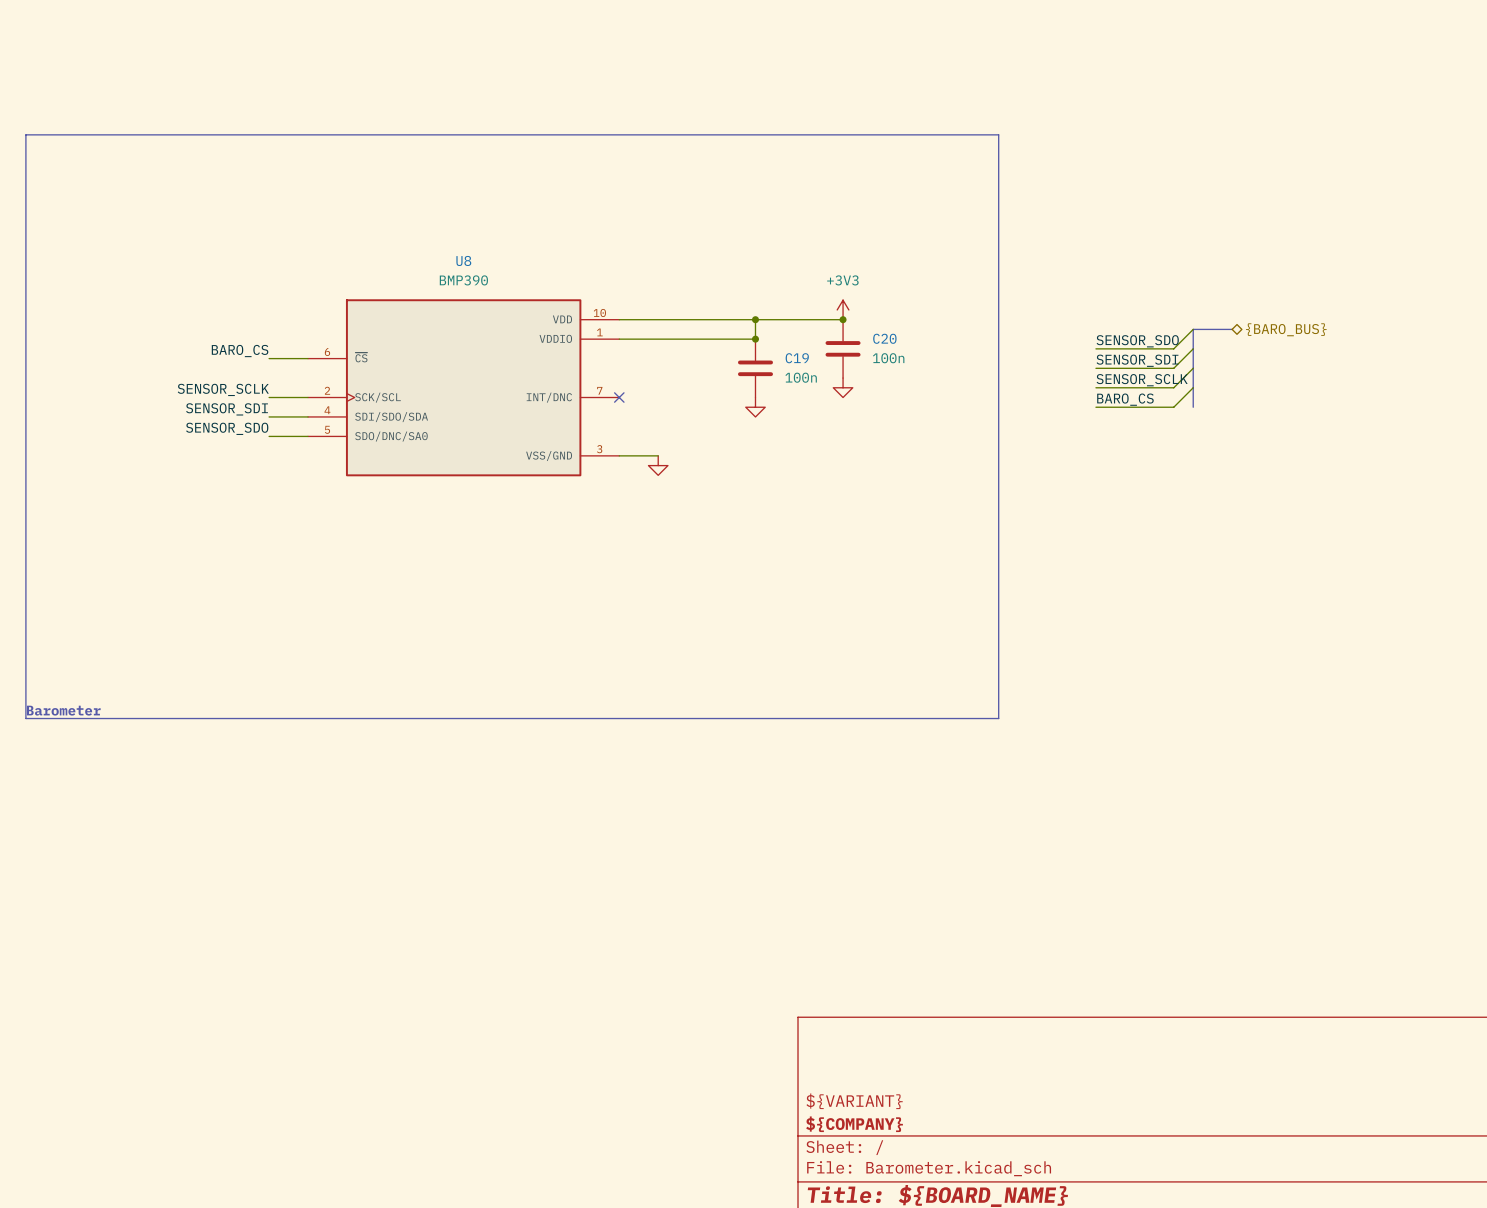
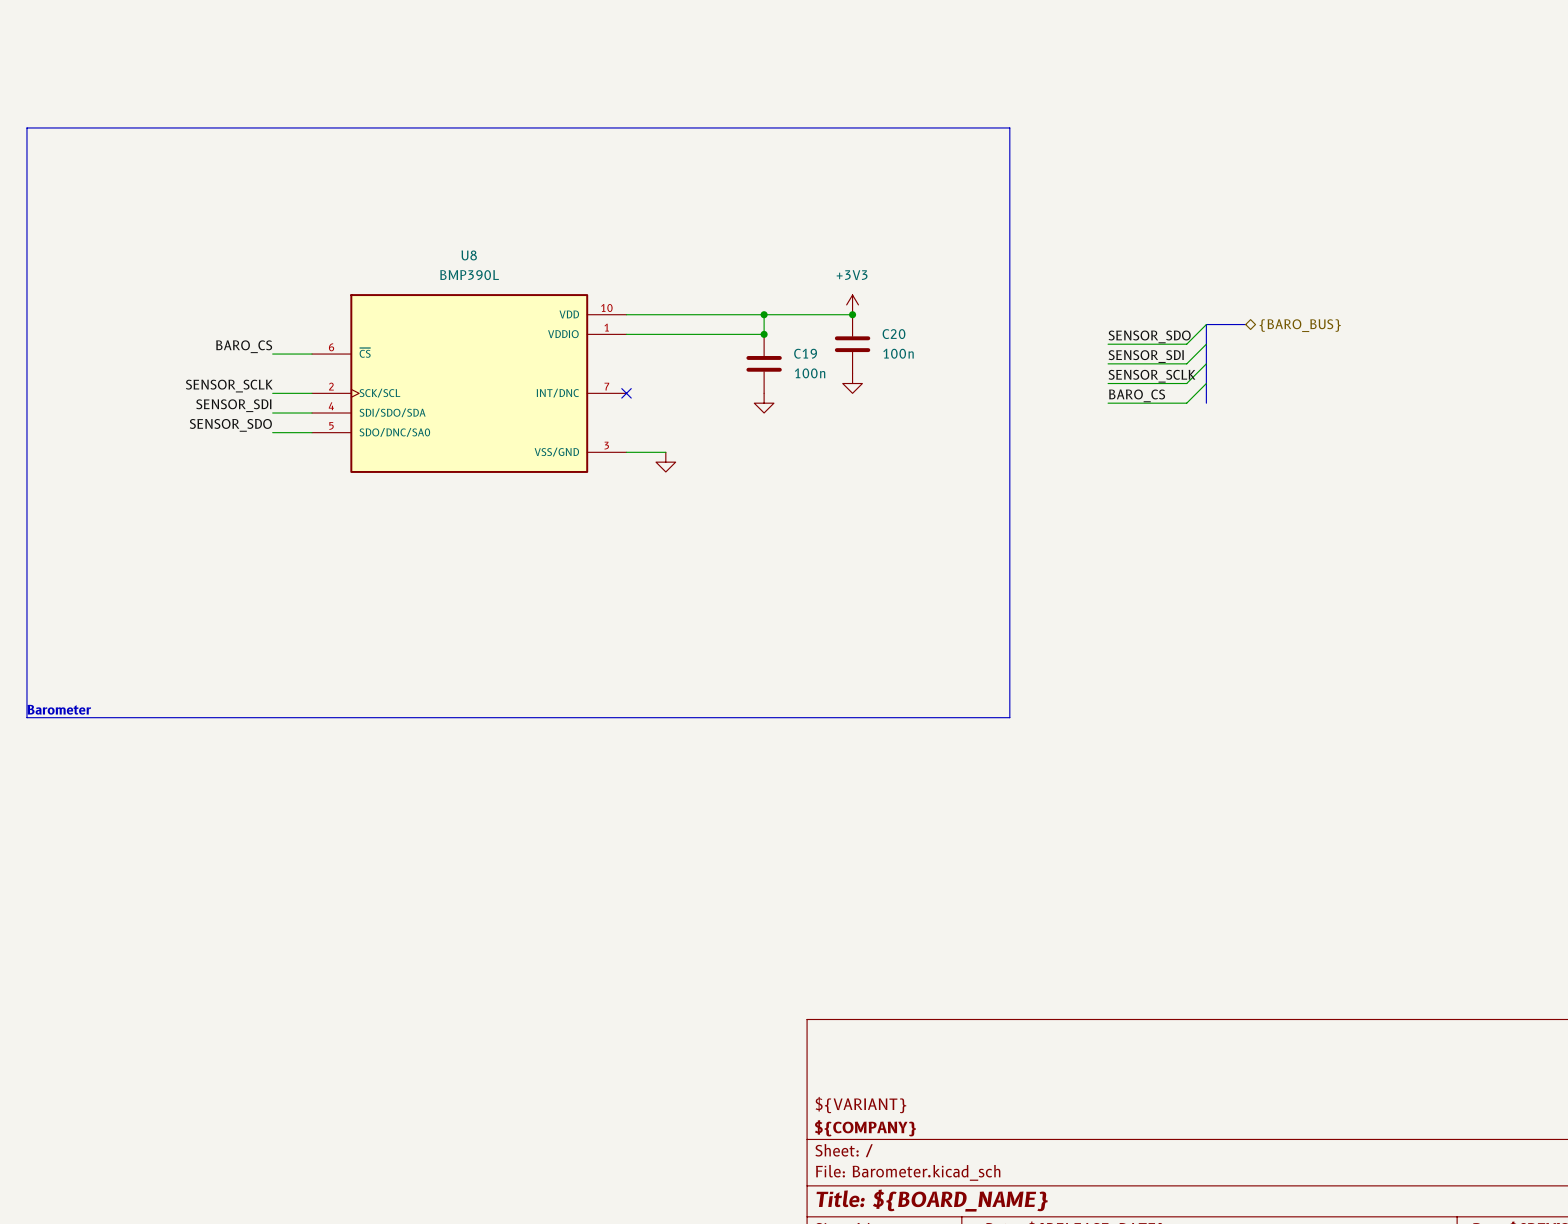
U8 value: BMP390 (463, 280) -> BMP390L (469, 275)

